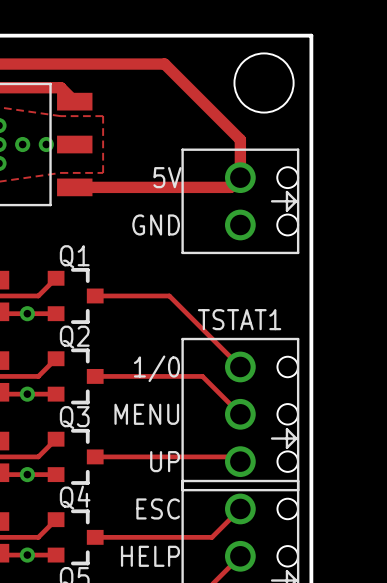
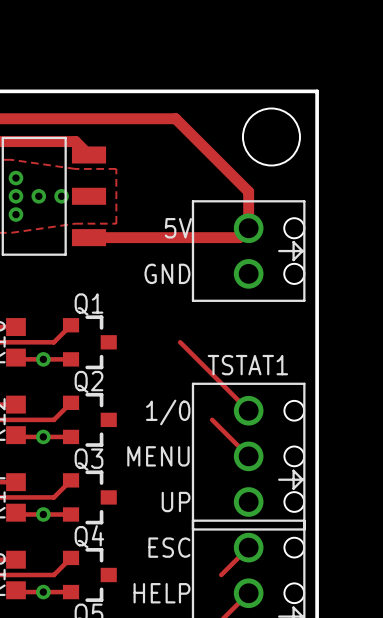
top track: (95, 295) (169, 295) -> none
top track: (95, 376) (202, 376) -> none
top track: (95, 456) (235, 456) -> none
top track: (95, 537) (211, 537) -> none

